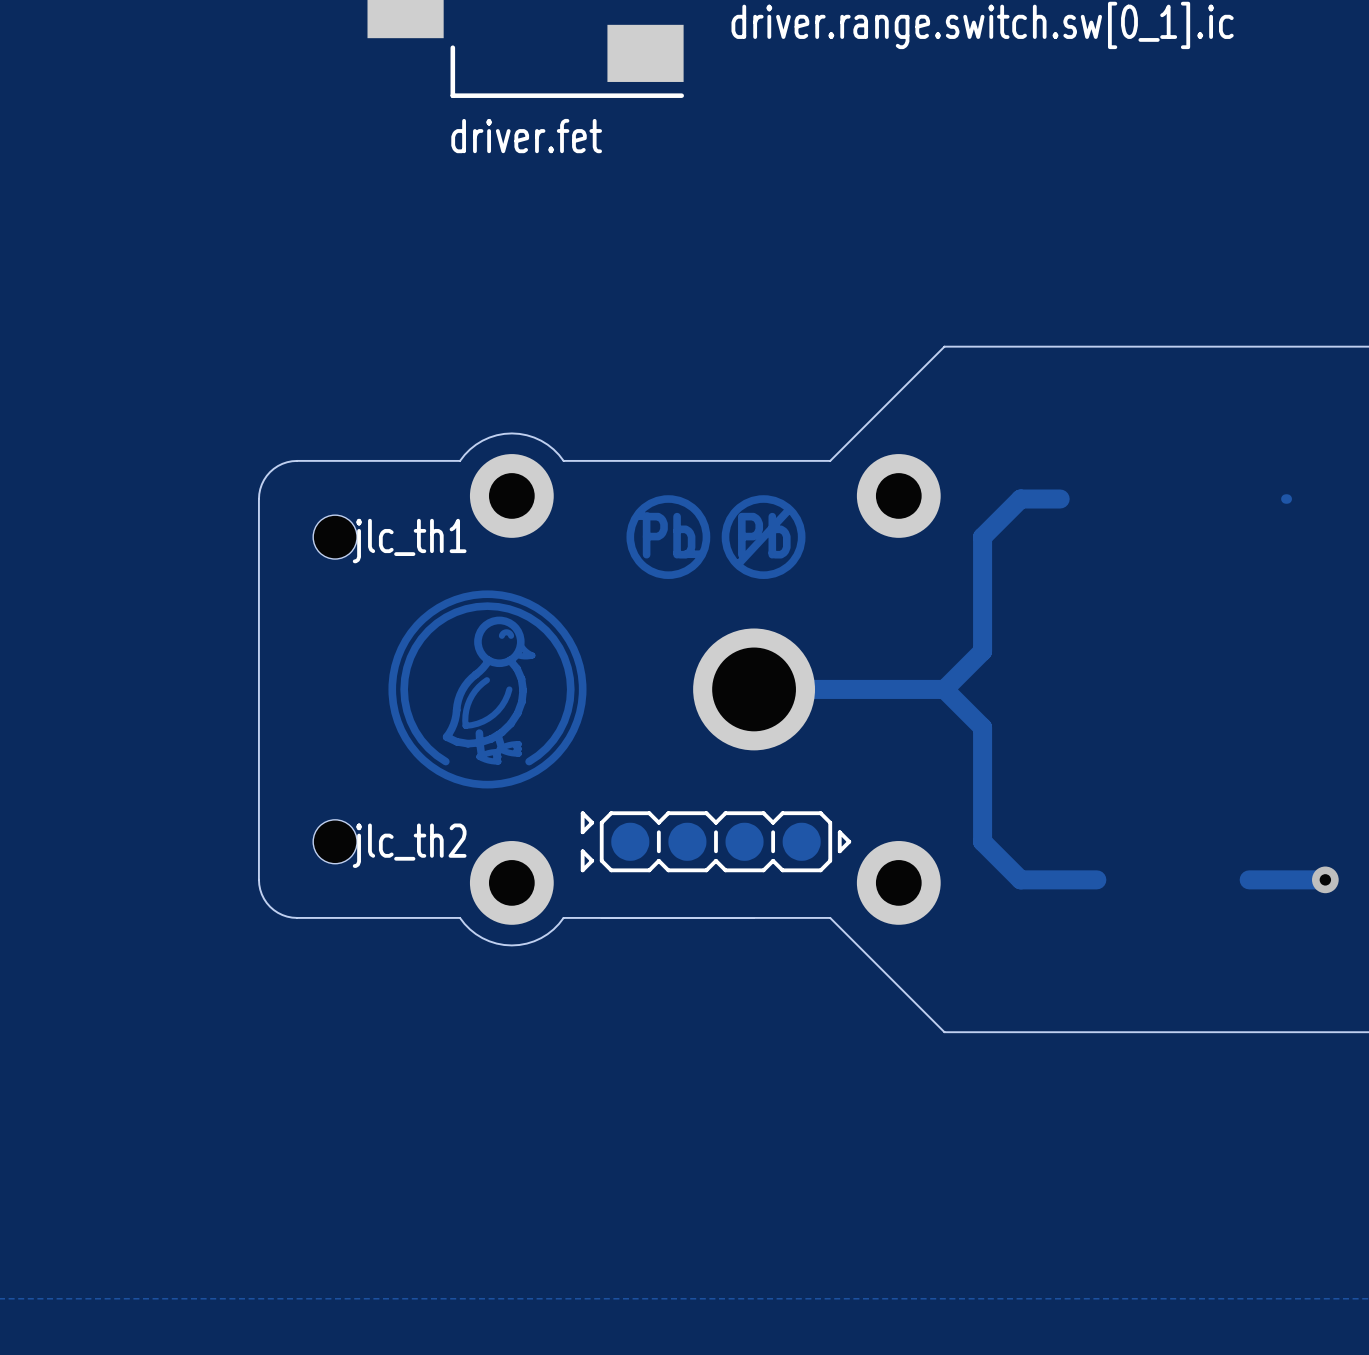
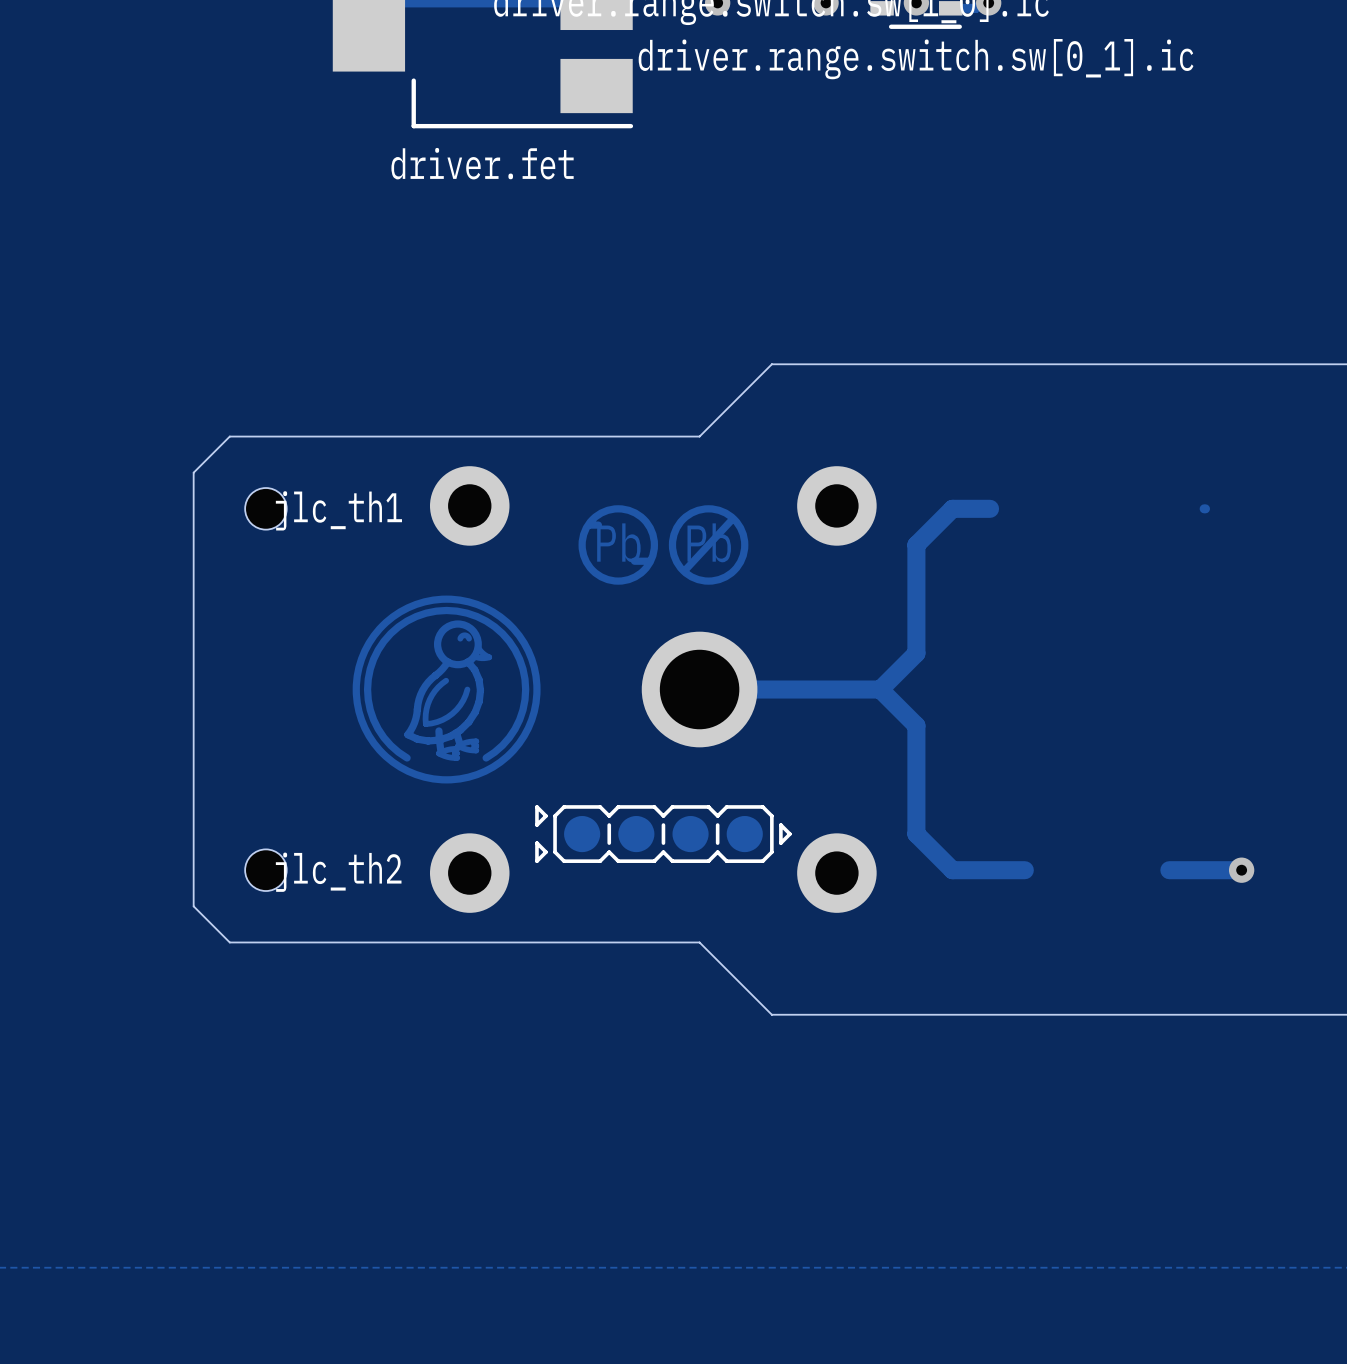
board edge: (944, 346) (830, 460) (563, 460) (553, 449) (541, 440) (526, 435) (504, 433) (489, 437) (476, 444) (460, 460) (287, 462) (278, 466) (266, 475) (261, 484) (258, 499) (258, 879) (261, 894) (273, 910) (287, 916) (297, 917) (460, 917) (470, 929) (482, 938) (496, 943) (511, 945) (526, 943) (541, 938) (553, 929) (563, 917) (830, 917) (944, 1032) -> (880, 364) (771, 364) (699, 436) (229, 436) (193, 472) (193, 906) (229, 942) (699, 942) (771, 1014) (880, 1014)
jlc_th1 position: (335, 537) -> (265, 508)
jlc_th2 position: (335, 841) -> (265, 870)

